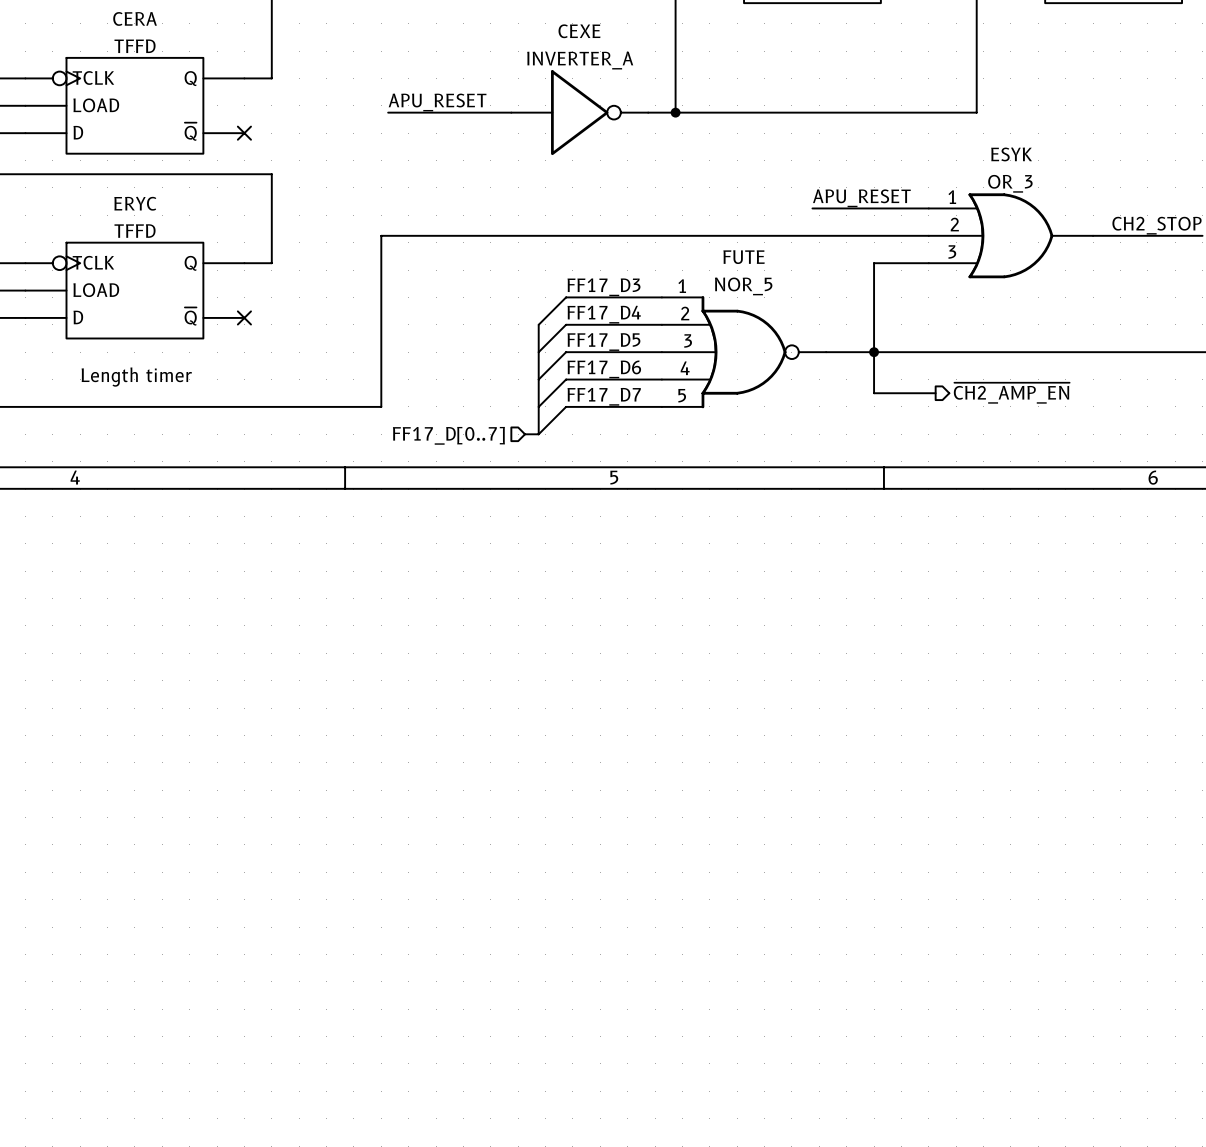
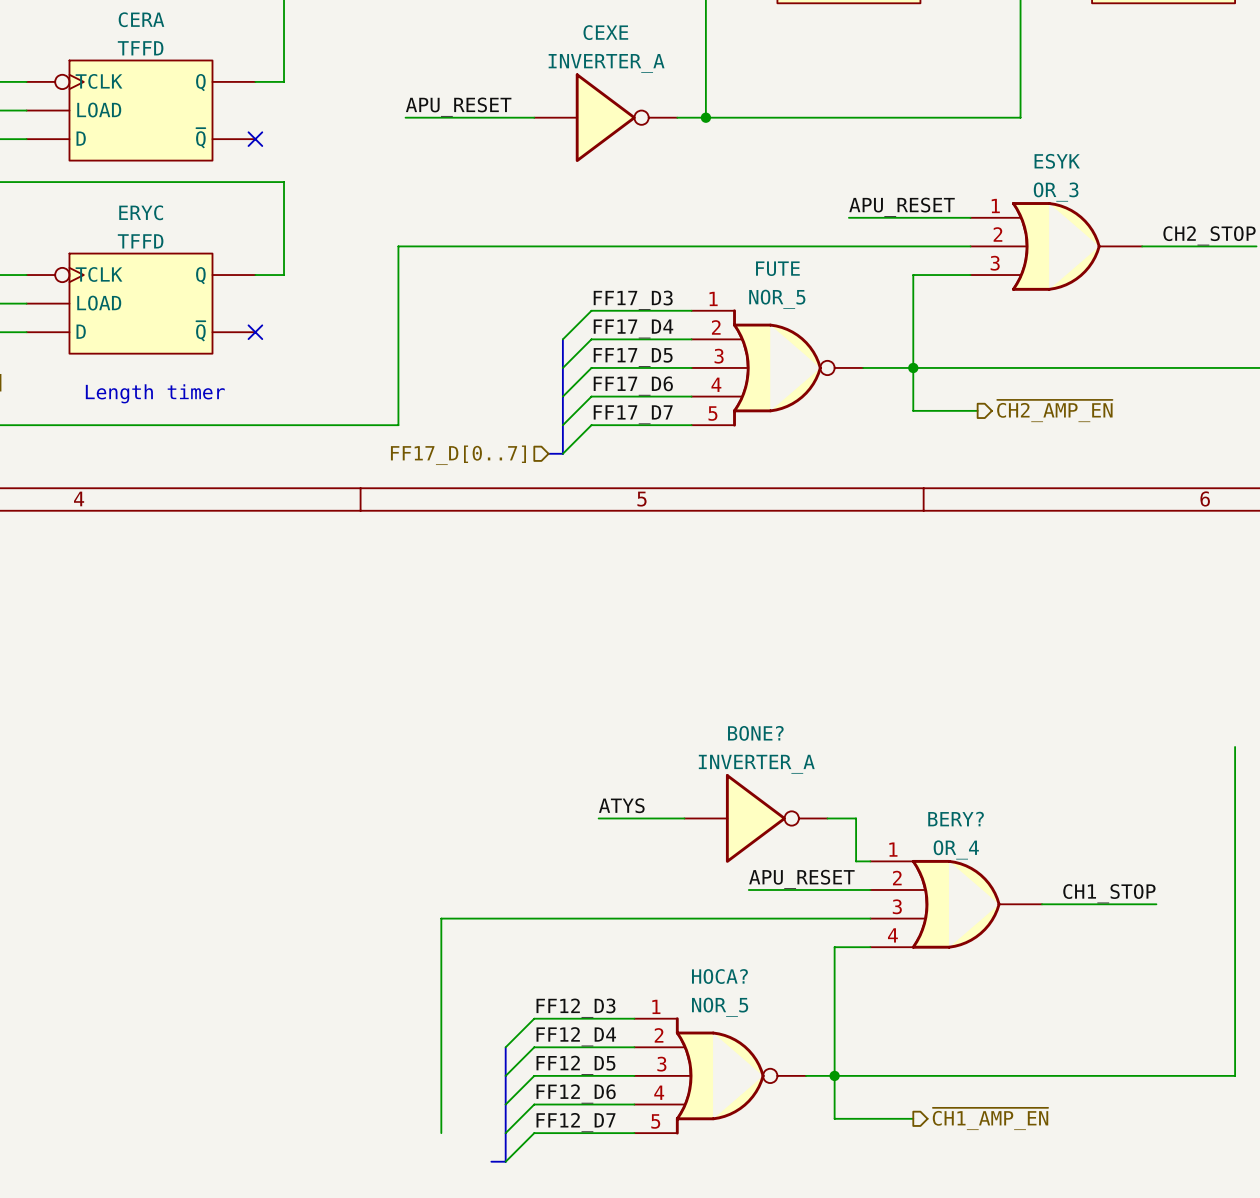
wire: none -> (1235, 746) (1235, 1075) (806, 1075)
label: none -> ATYS (621, 805)
wire: none -> (598, 818) (684, 818)
BONE?: none -> INVERTER_A (755, 818)
wire: none -> (827, 818) (856, 818) (856, 861) (870, 861)
label: none -> APU_RESET (801, 879)
wire: none -> (748, 889) (870, 889)
label: none -> CH1_STOP (1109, 893)
BERY?: none -> OR_4 (956, 904)
wire: none -> (1042, 904) (1156, 904)
wire: none -> (870, 918) (441, 918) (441, 1133)
wire: none -> (870, 947) (834, 947) (834, 1118) (913, 1118)
label: none -> FF12_D3 (576, 1008)
wire: none -> (634, 1018) (534, 1018) (505, 1047)
label: none -> FF12_D4 (576, 1036)
bus: none -> (505, 1047) (505, 1161) (491, 1161)
wire: none -> (634, 1047) (534, 1047) (505, 1075)
label: none -> FF12_D5 (575, 1065)
wire: none -> (634, 1075) (534, 1075) (505, 1104)
HOCA?: none -> NOR_5 (720, 1075)
junction: none -> (834, 1075)
label: none -> FF12_D6 (576, 1093)
wire: none -> (634, 1104) (534, 1104) (505, 1133)
hierarchical label: none -> ~{CH1_AMP_EN} (990, 1118)
label: none -> FF12_D7 (576, 1122)
wire: none -> (634, 1133) (534, 1133) (505, 1161)

